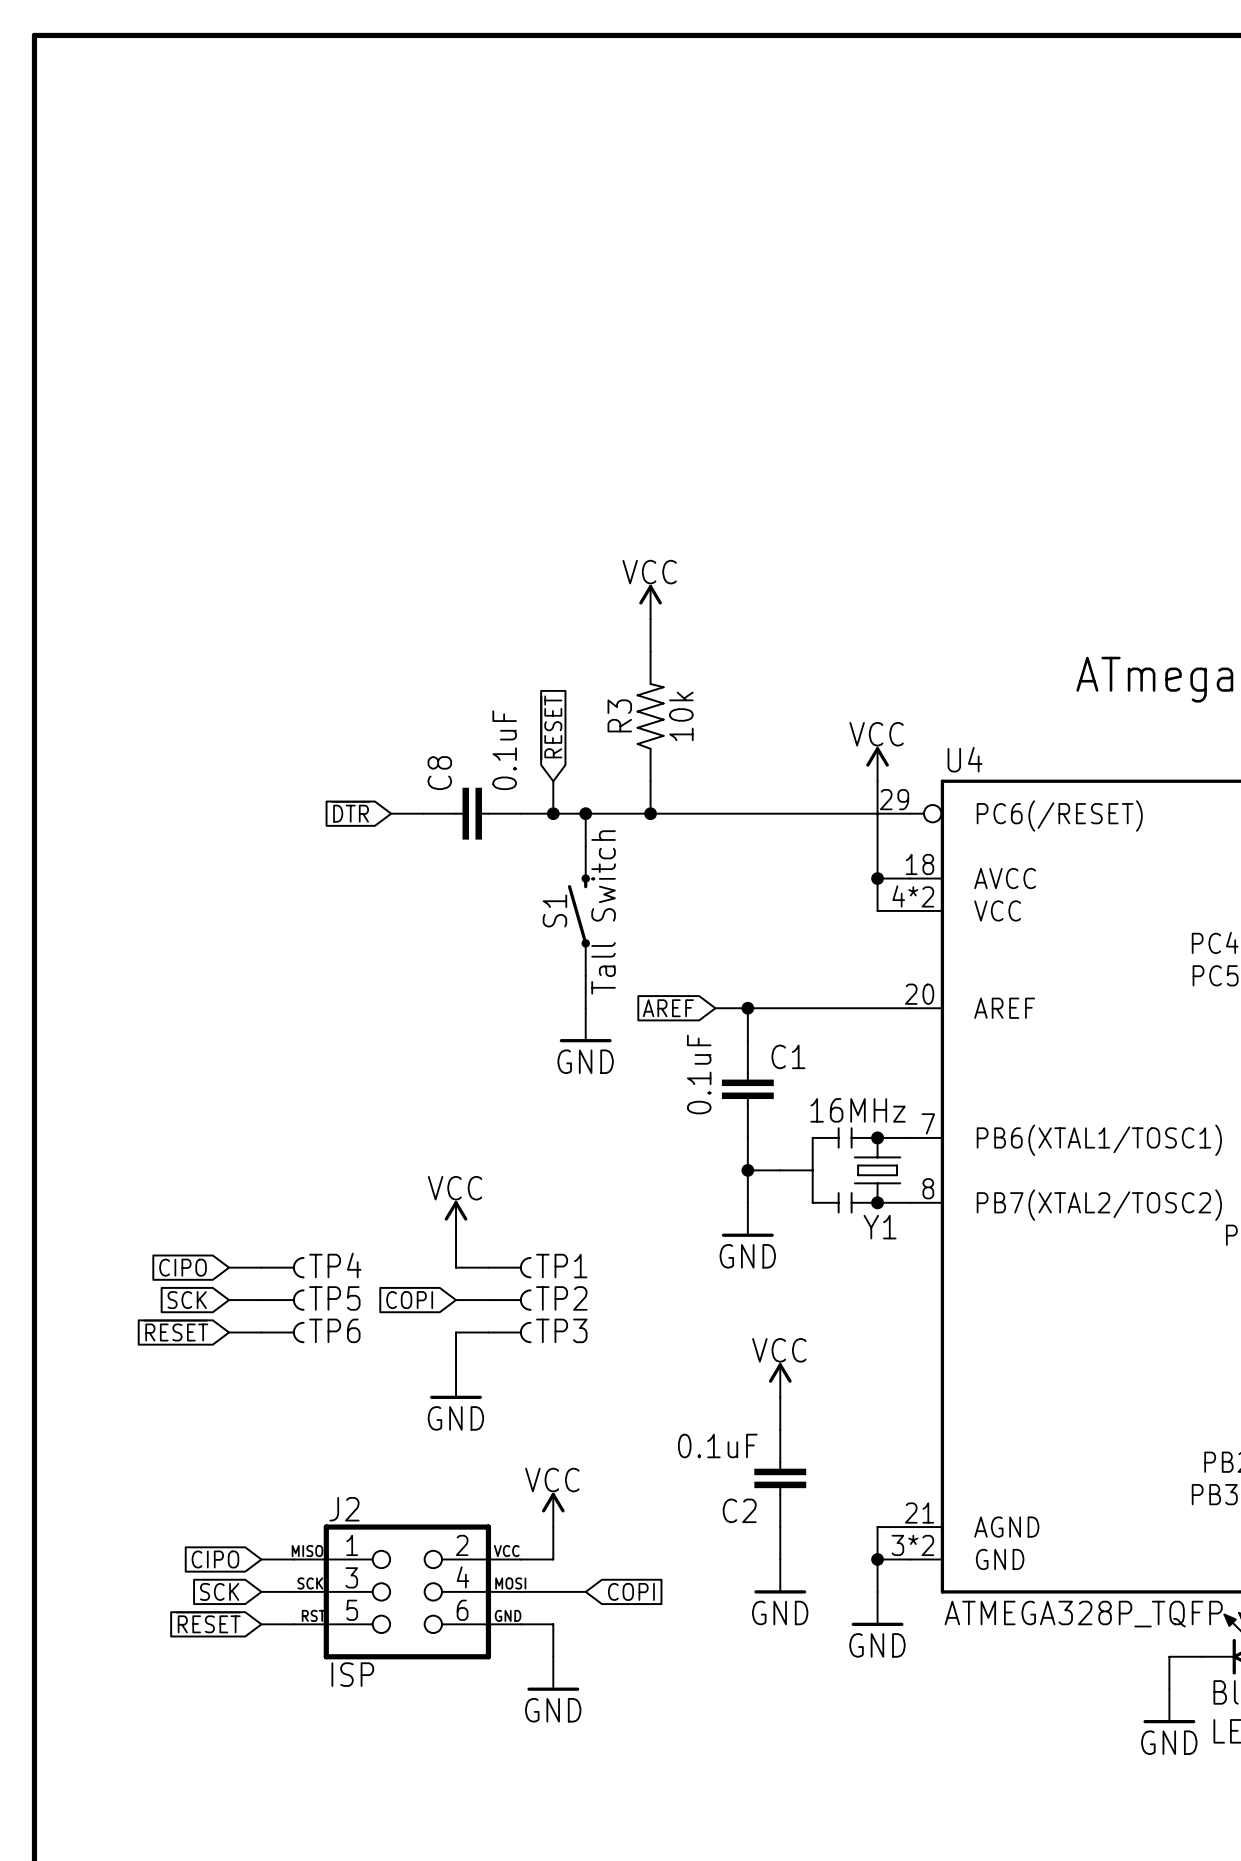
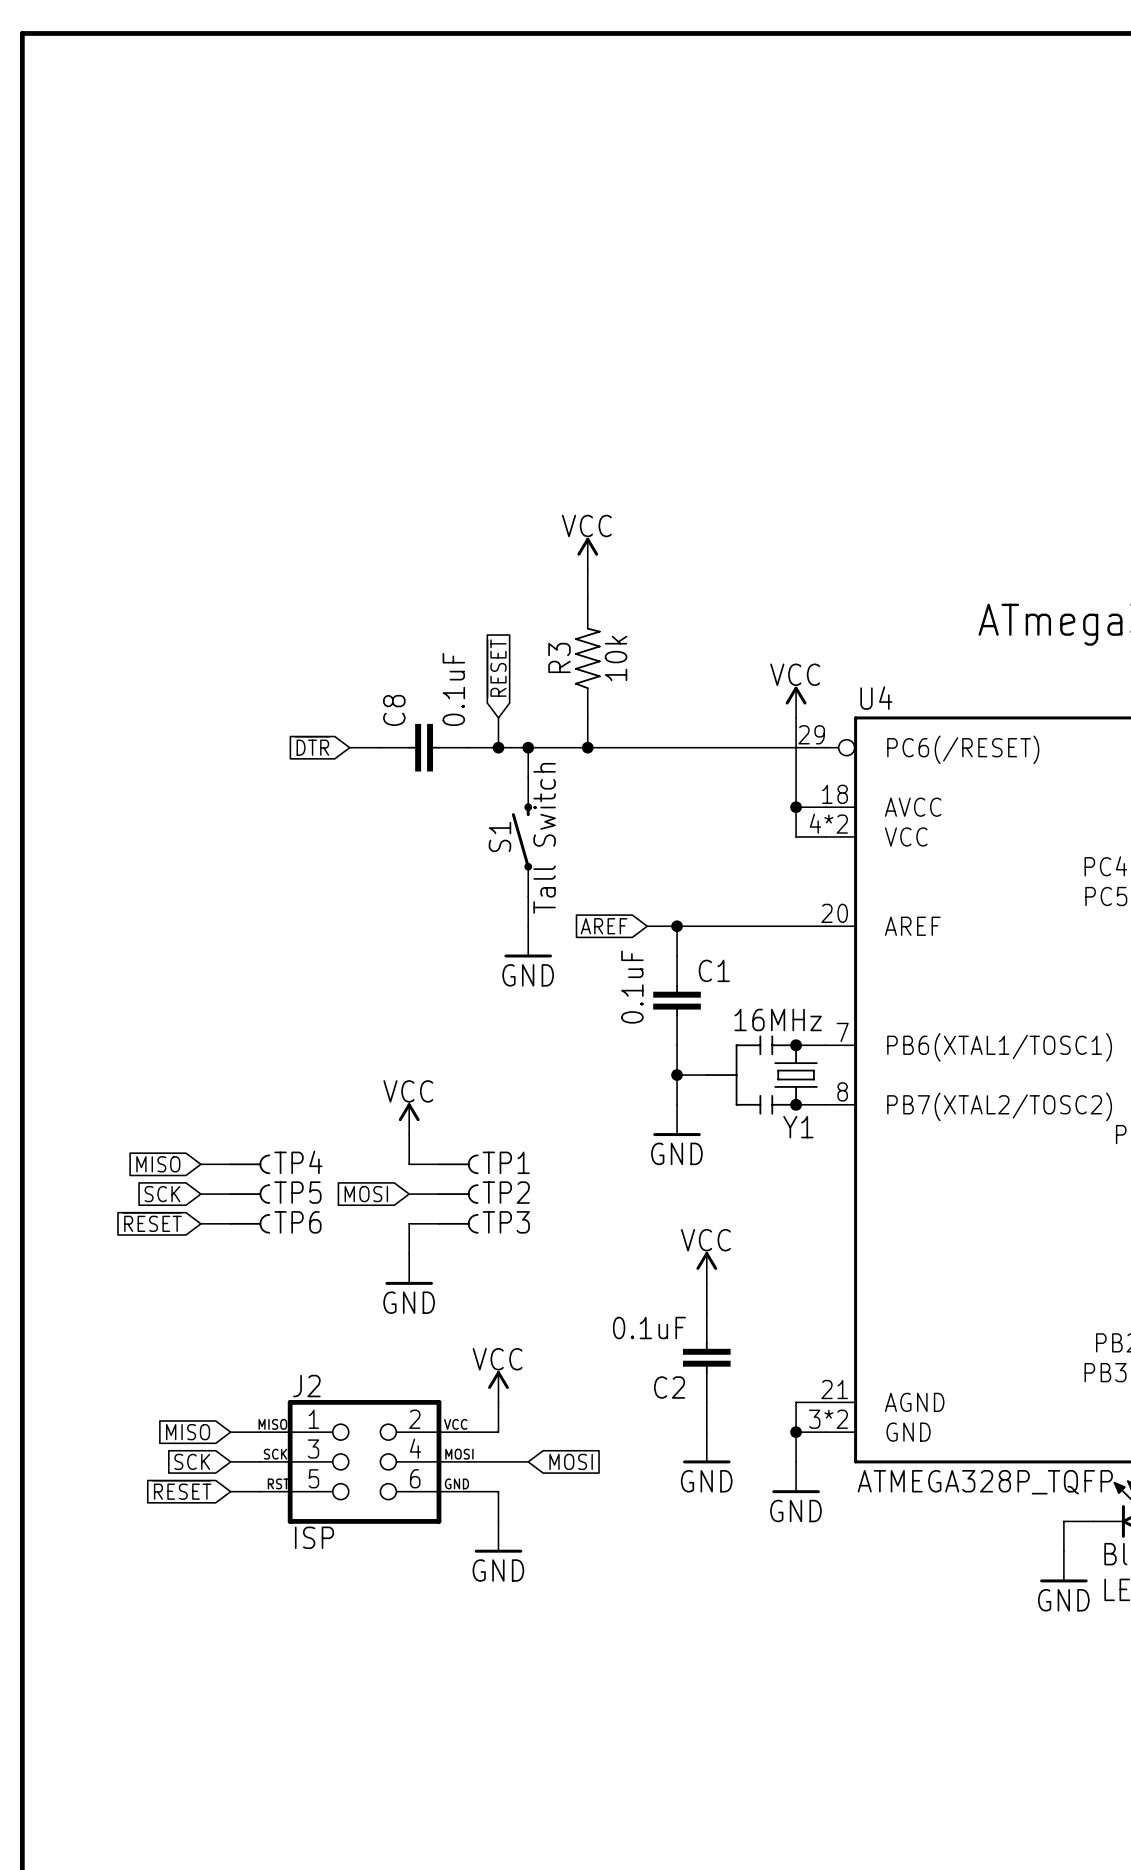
global label: CIPO (183, 1267) -> MISO (158, 1164)
global label: COPI (409, 1300) -> MOSI (366, 1194)
global label: CIPO (215, 1559) -> MISO (188, 1432)
global label: COPI (631, 1591) -> MOSI (571, 1461)

